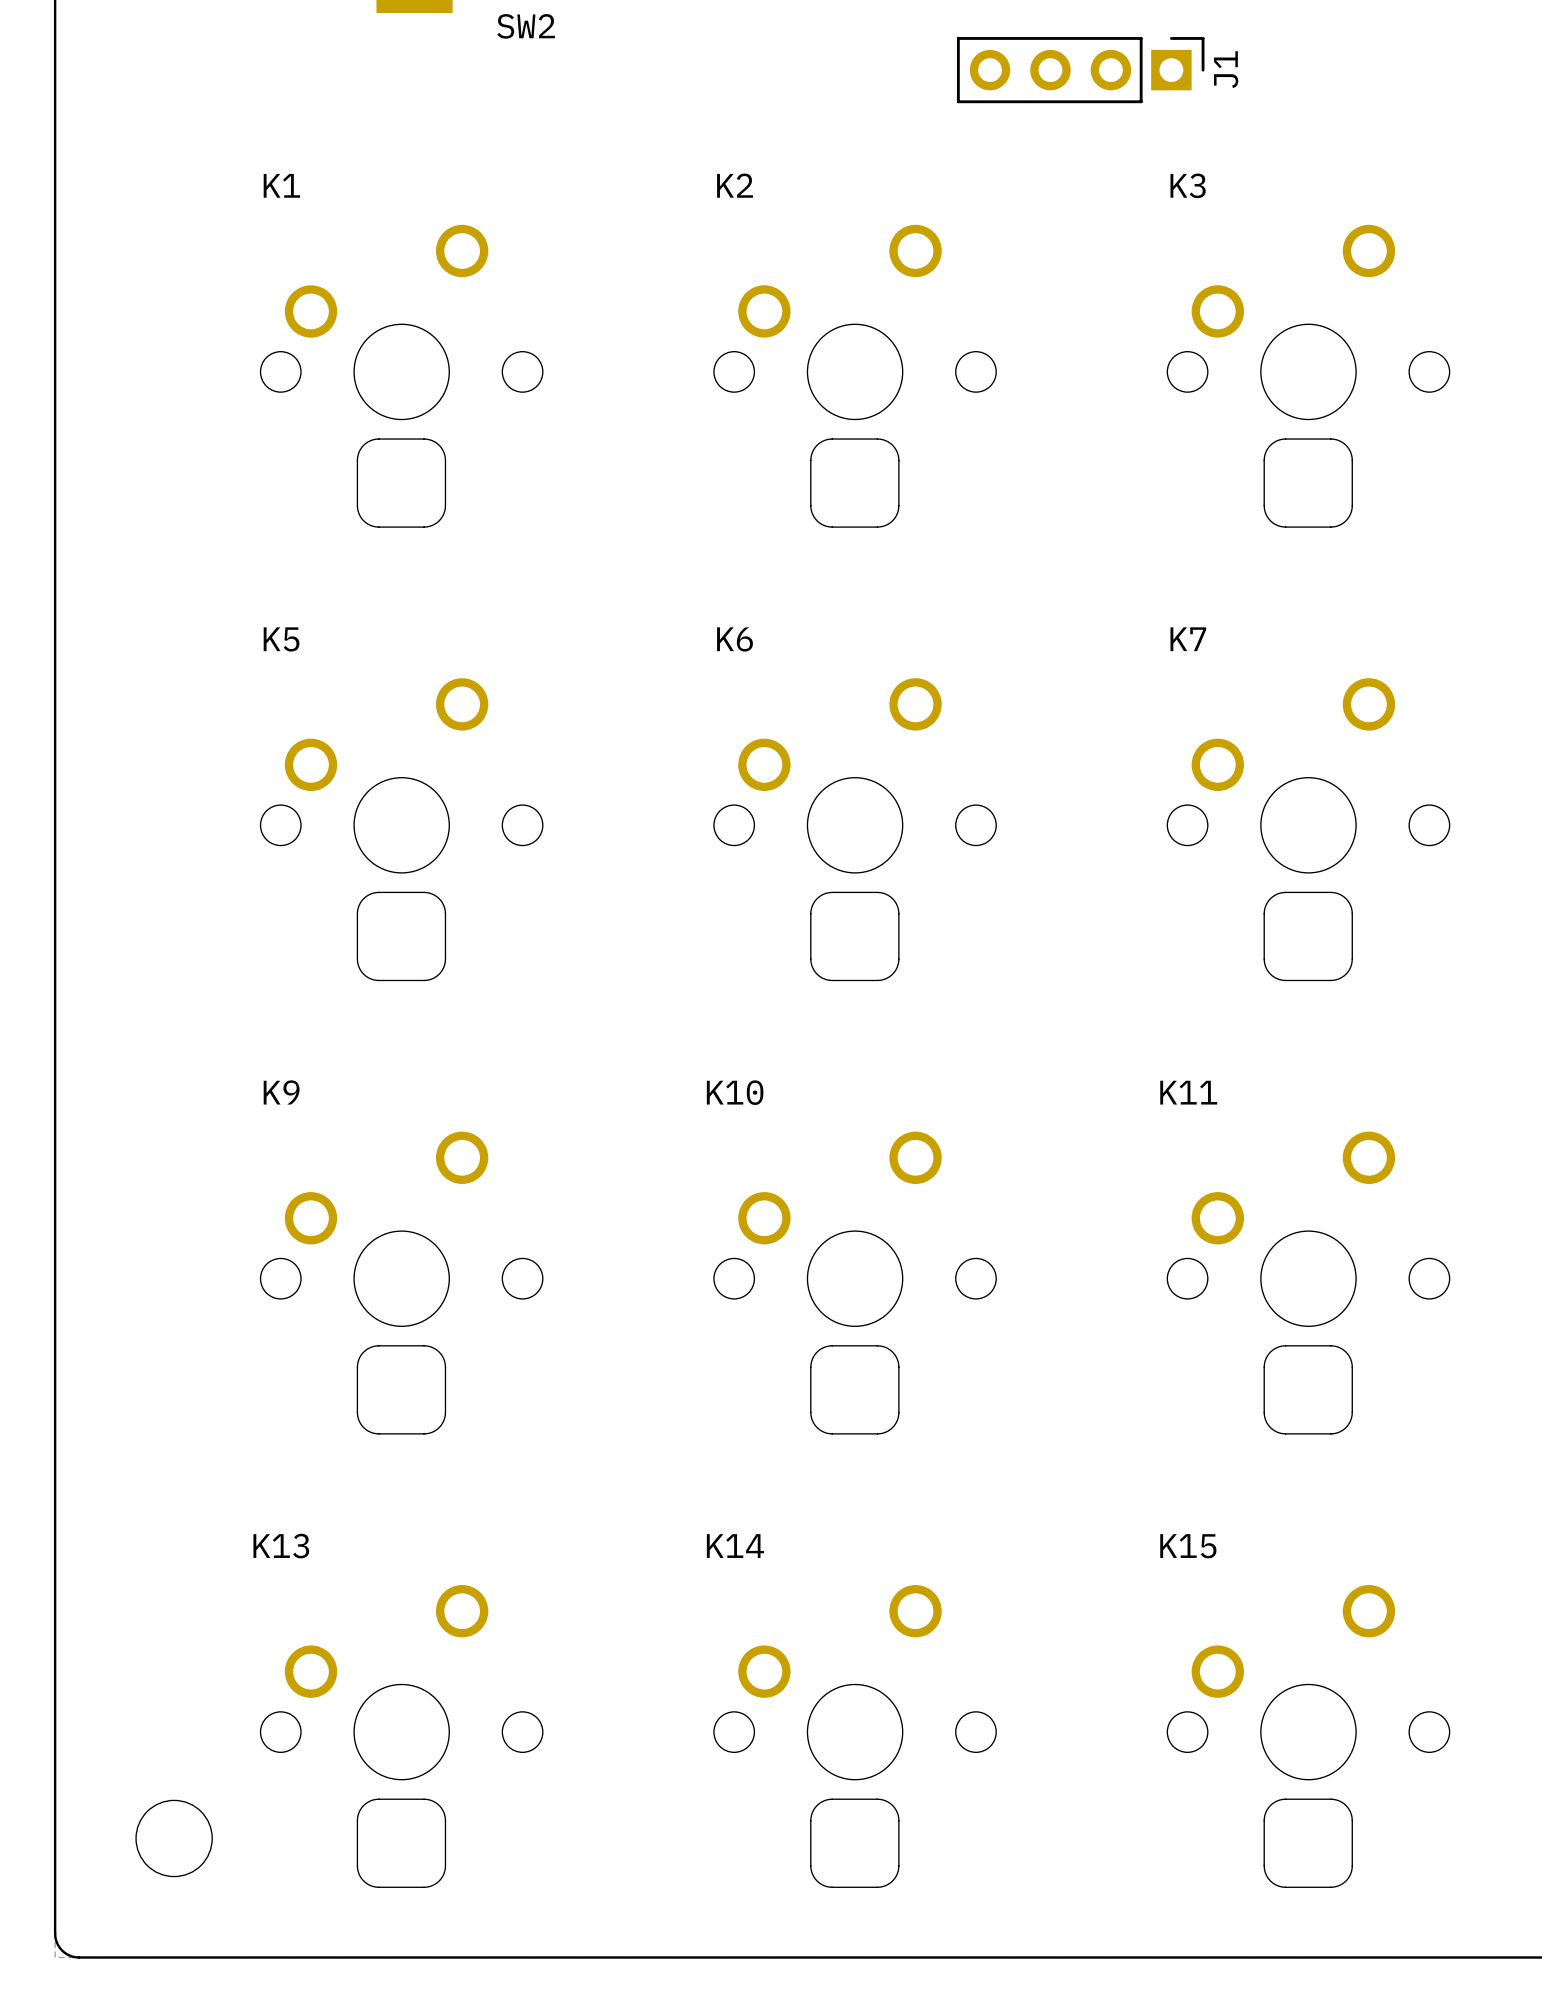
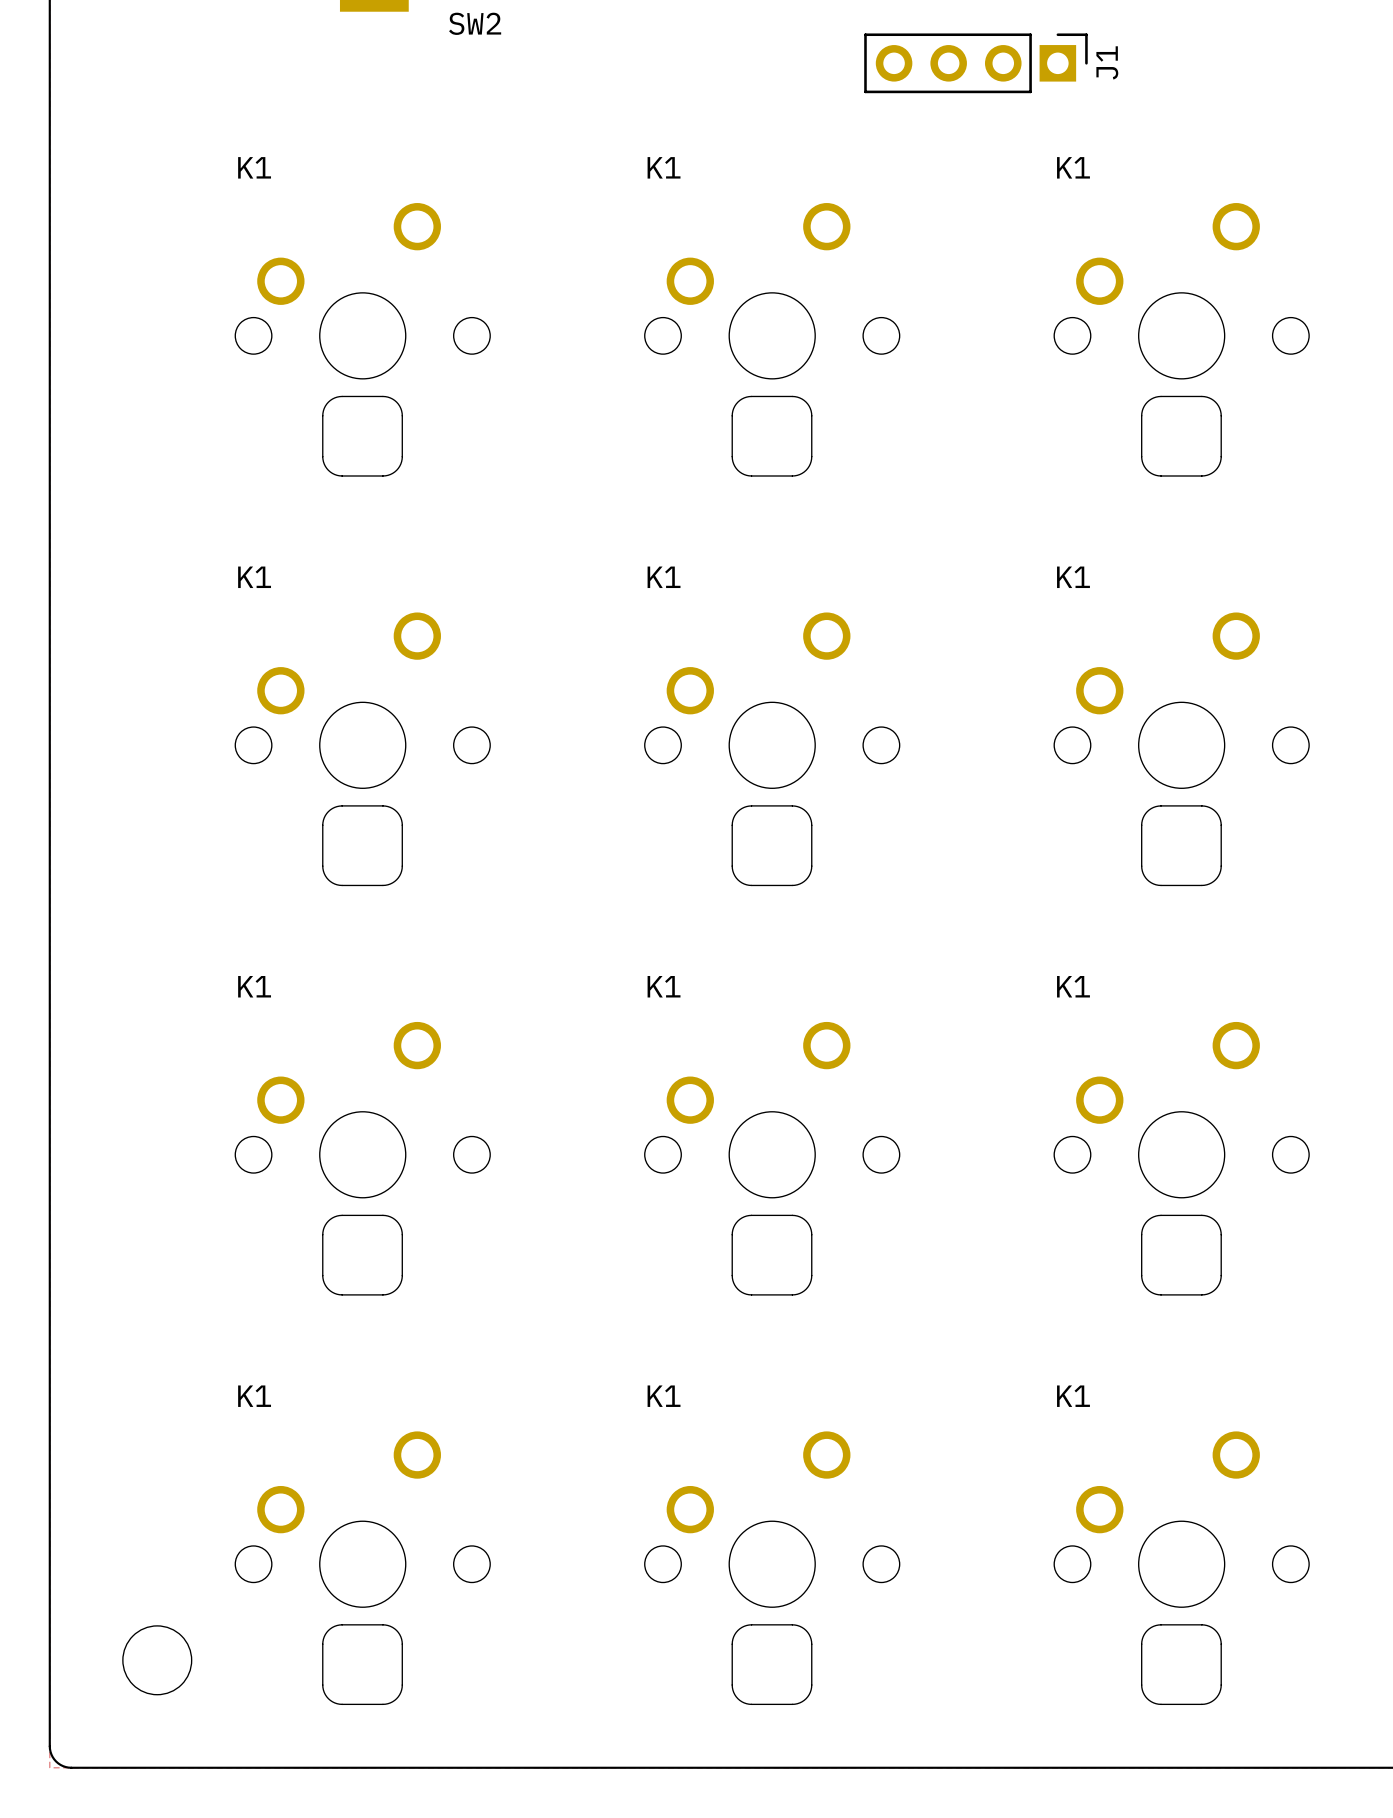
K2 name: K2 (735, 185) -> K1 (664, 167)
K3 name: K3 (1188, 185) -> K1 (1073, 167)
K5 name: K5 (281, 639) -> K1 (254, 577)
K6 name: K6 (735, 639) -> K1 (664, 577)
K7 name: K7 (1188, 639) -> K1 (1073, 577)
K9 name: K9 (281, 1092) -> K1 (254, 986)
K10 name: K10 (735, 1092) -> K1 (664, 986)
K11 name: K11 (1188, 1092) -> K1 (1073, 986)
K13 name: K13 (281, 1546) -> K1 (254, 1396)
K14 name: K14 (735, 1546) -> K1 (664, 1396)
K15 name: K15 (1188, 1546) -> K1 (1073, 1396)

